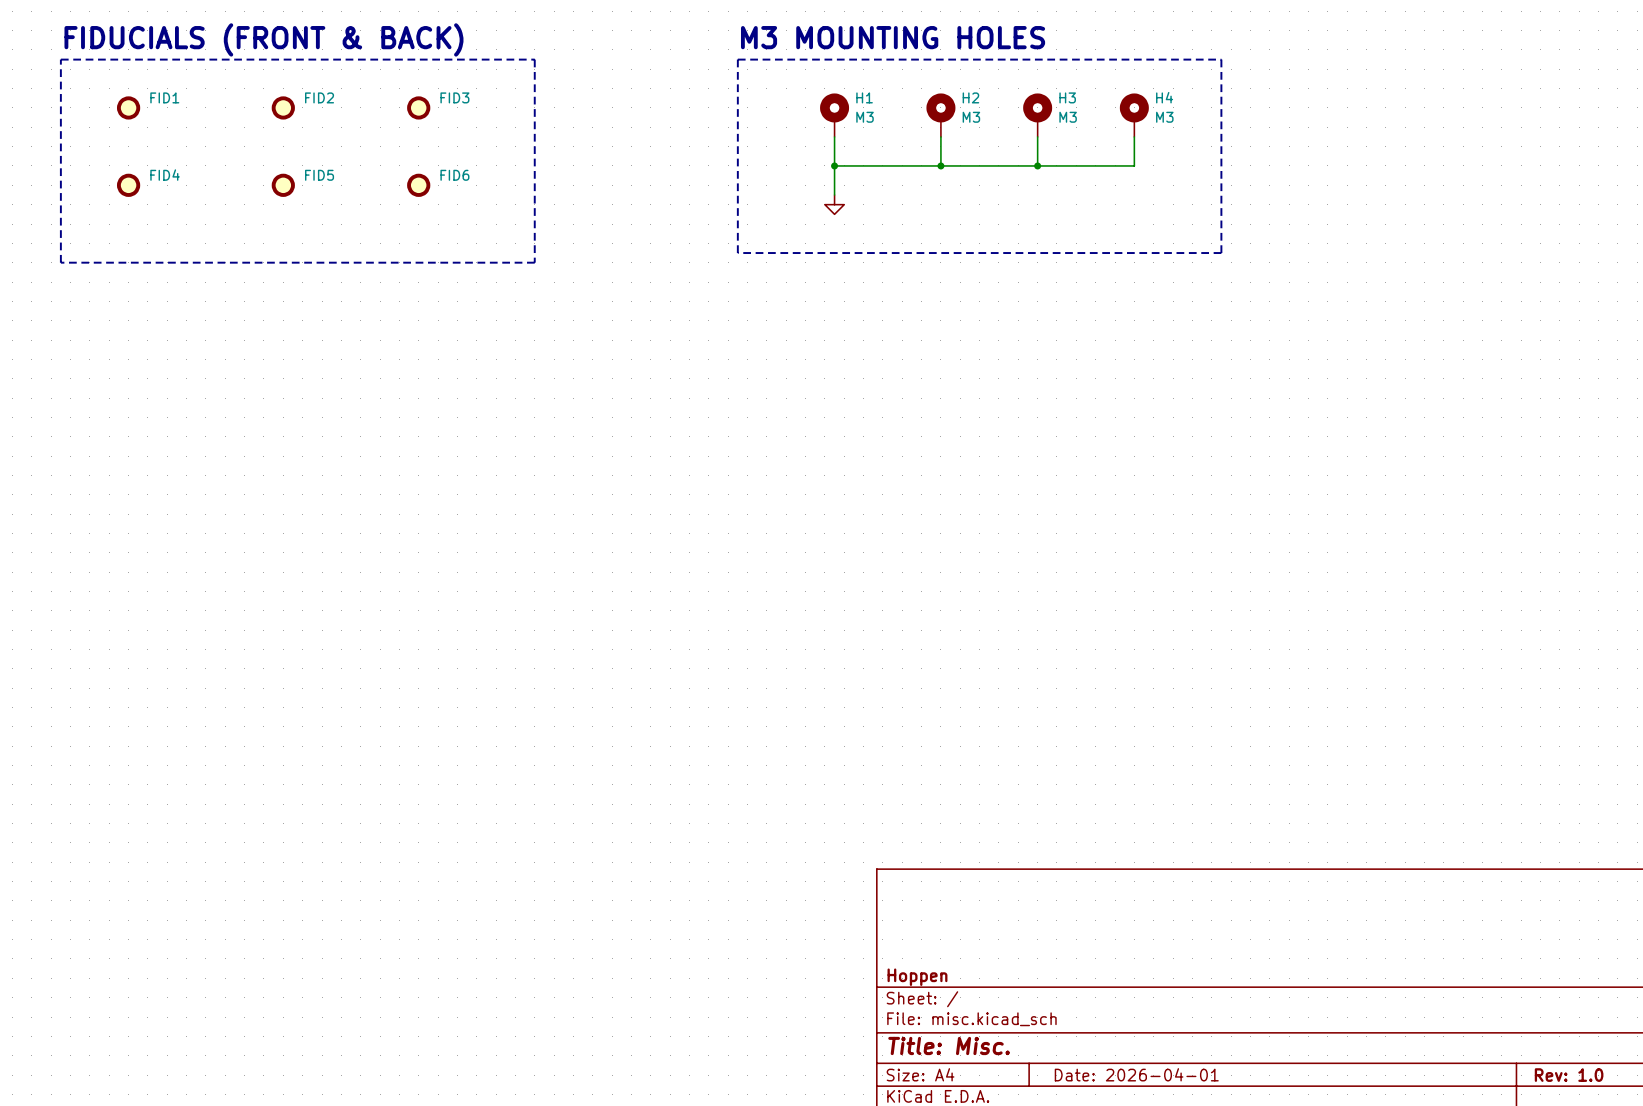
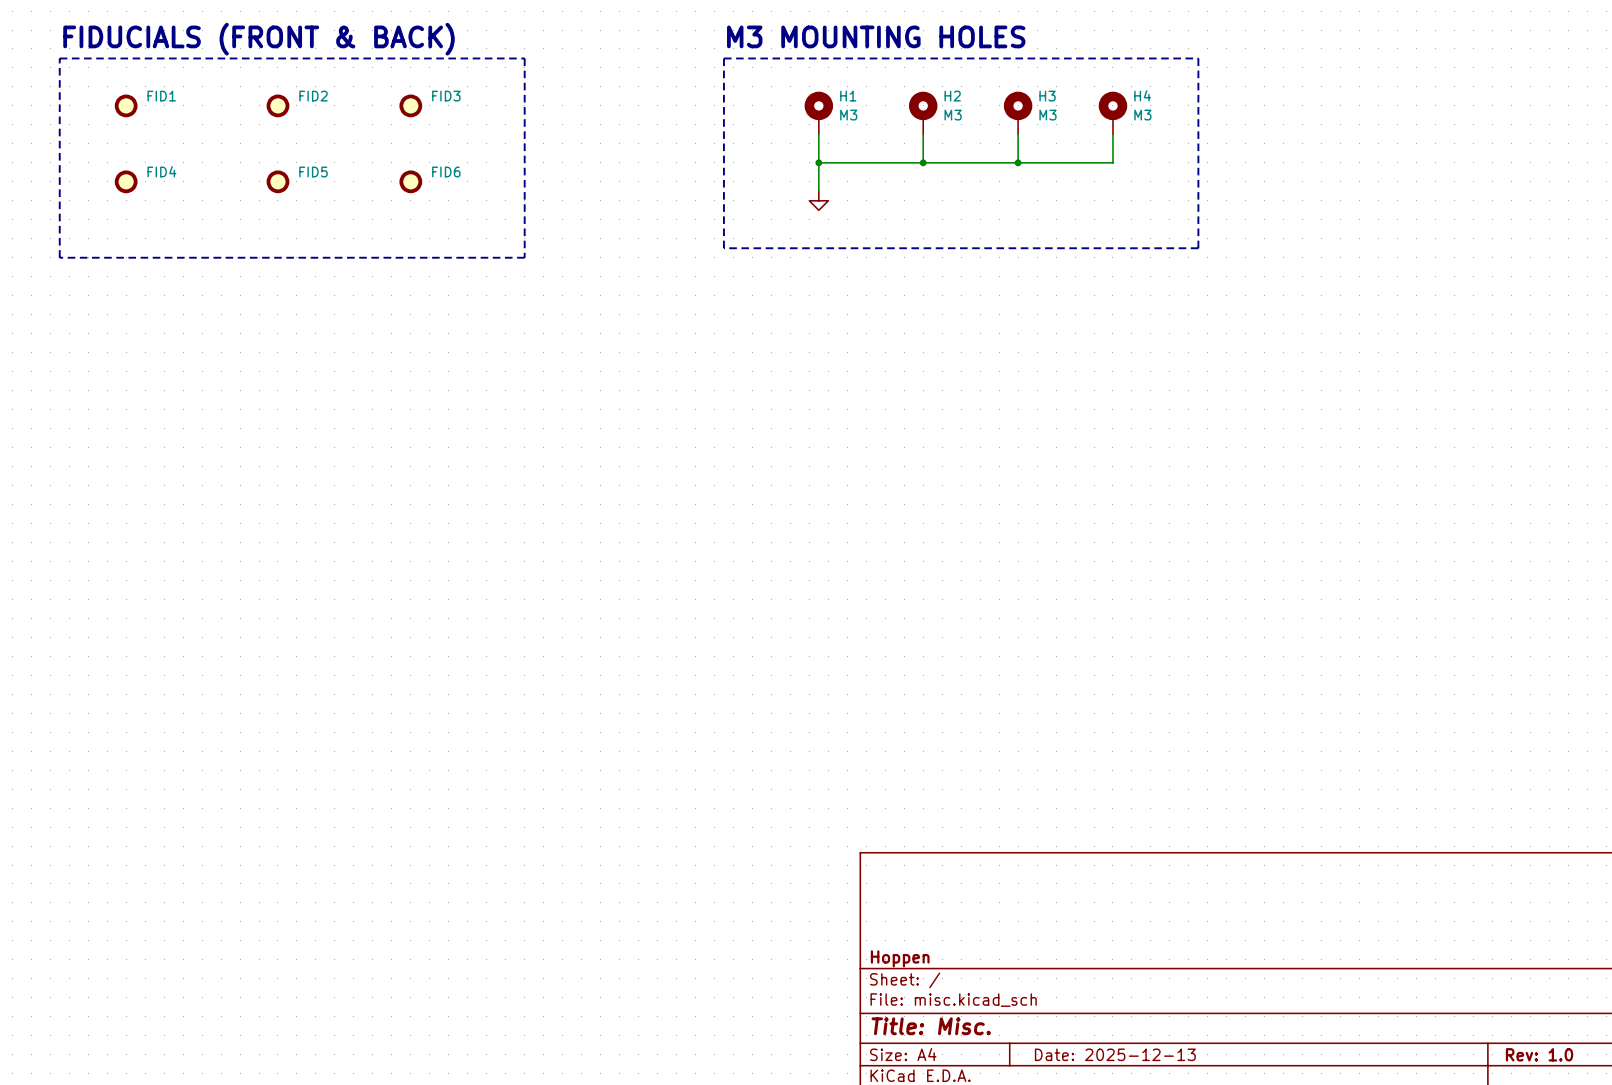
title block: Date: 2026-04-01 (1136, 1074) -> Date: 2025-12-13 (1115, 1054)

